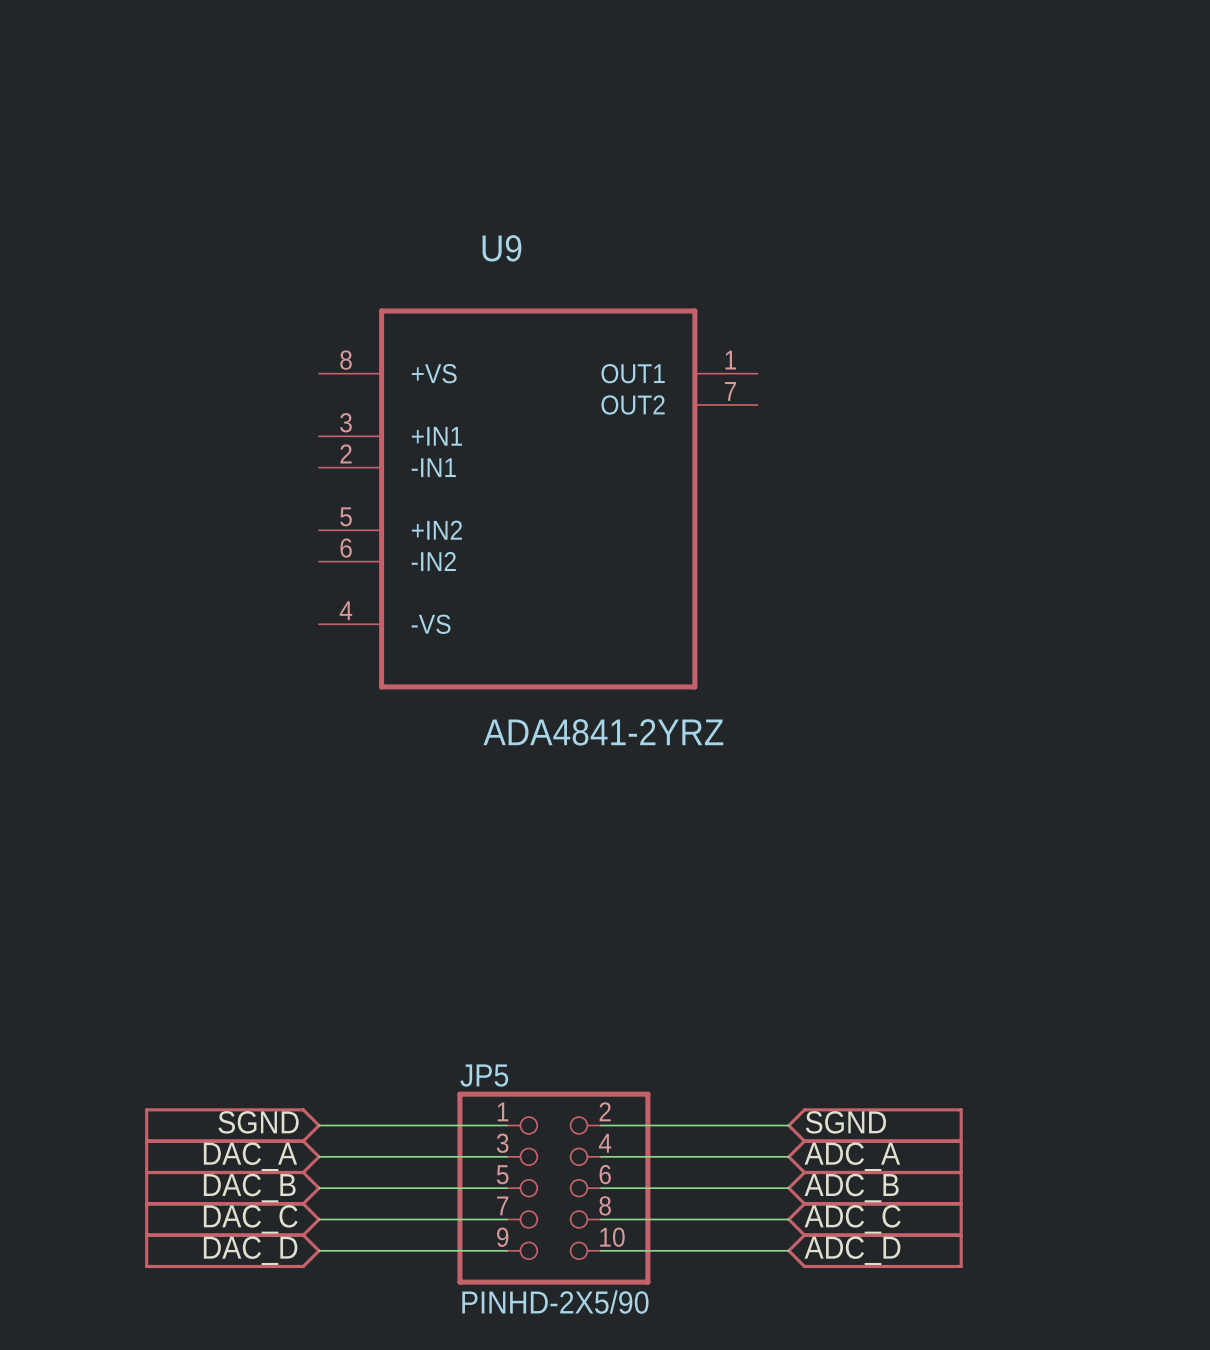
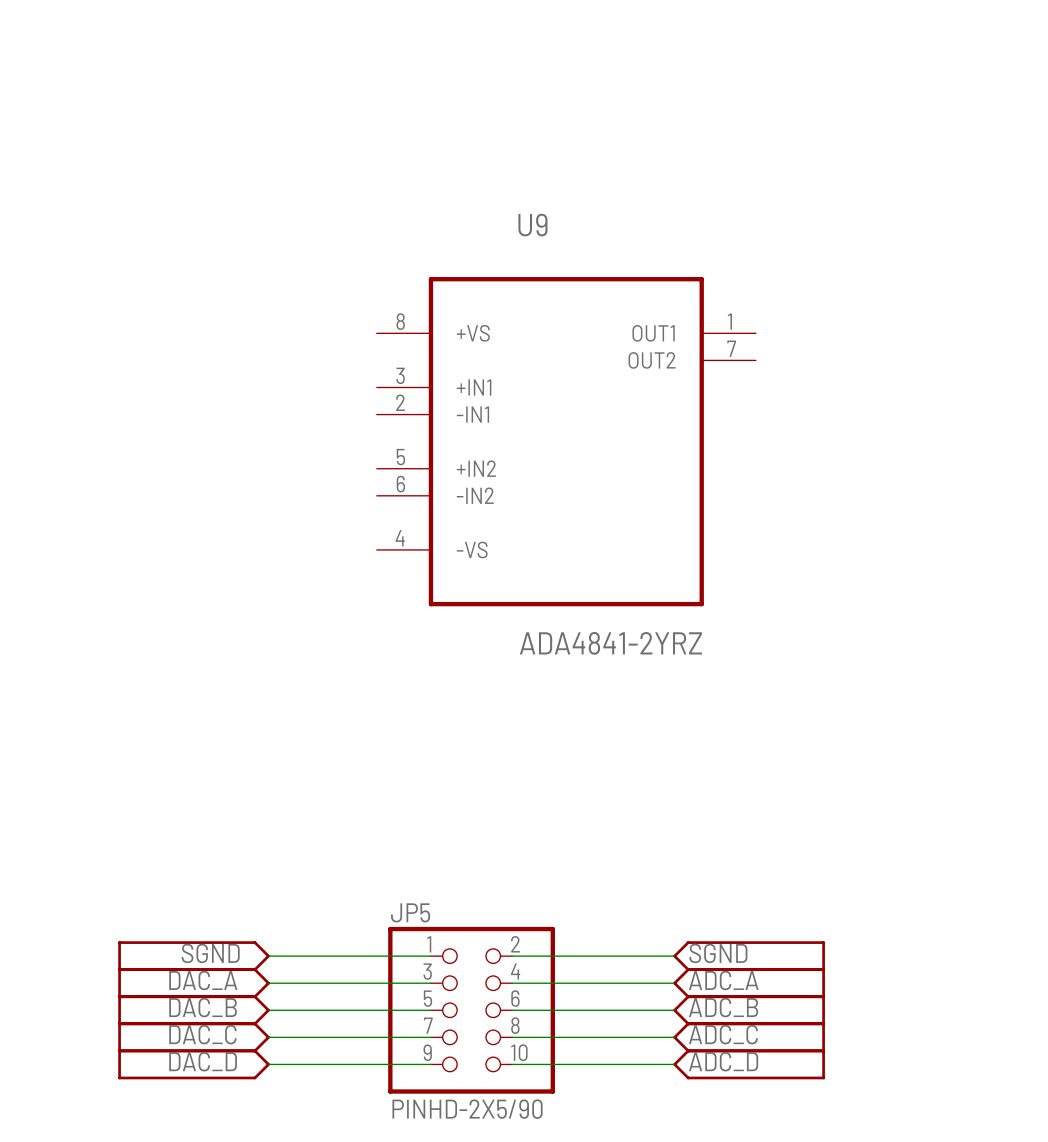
U9 position: (538, 498) -> (566, 441)

